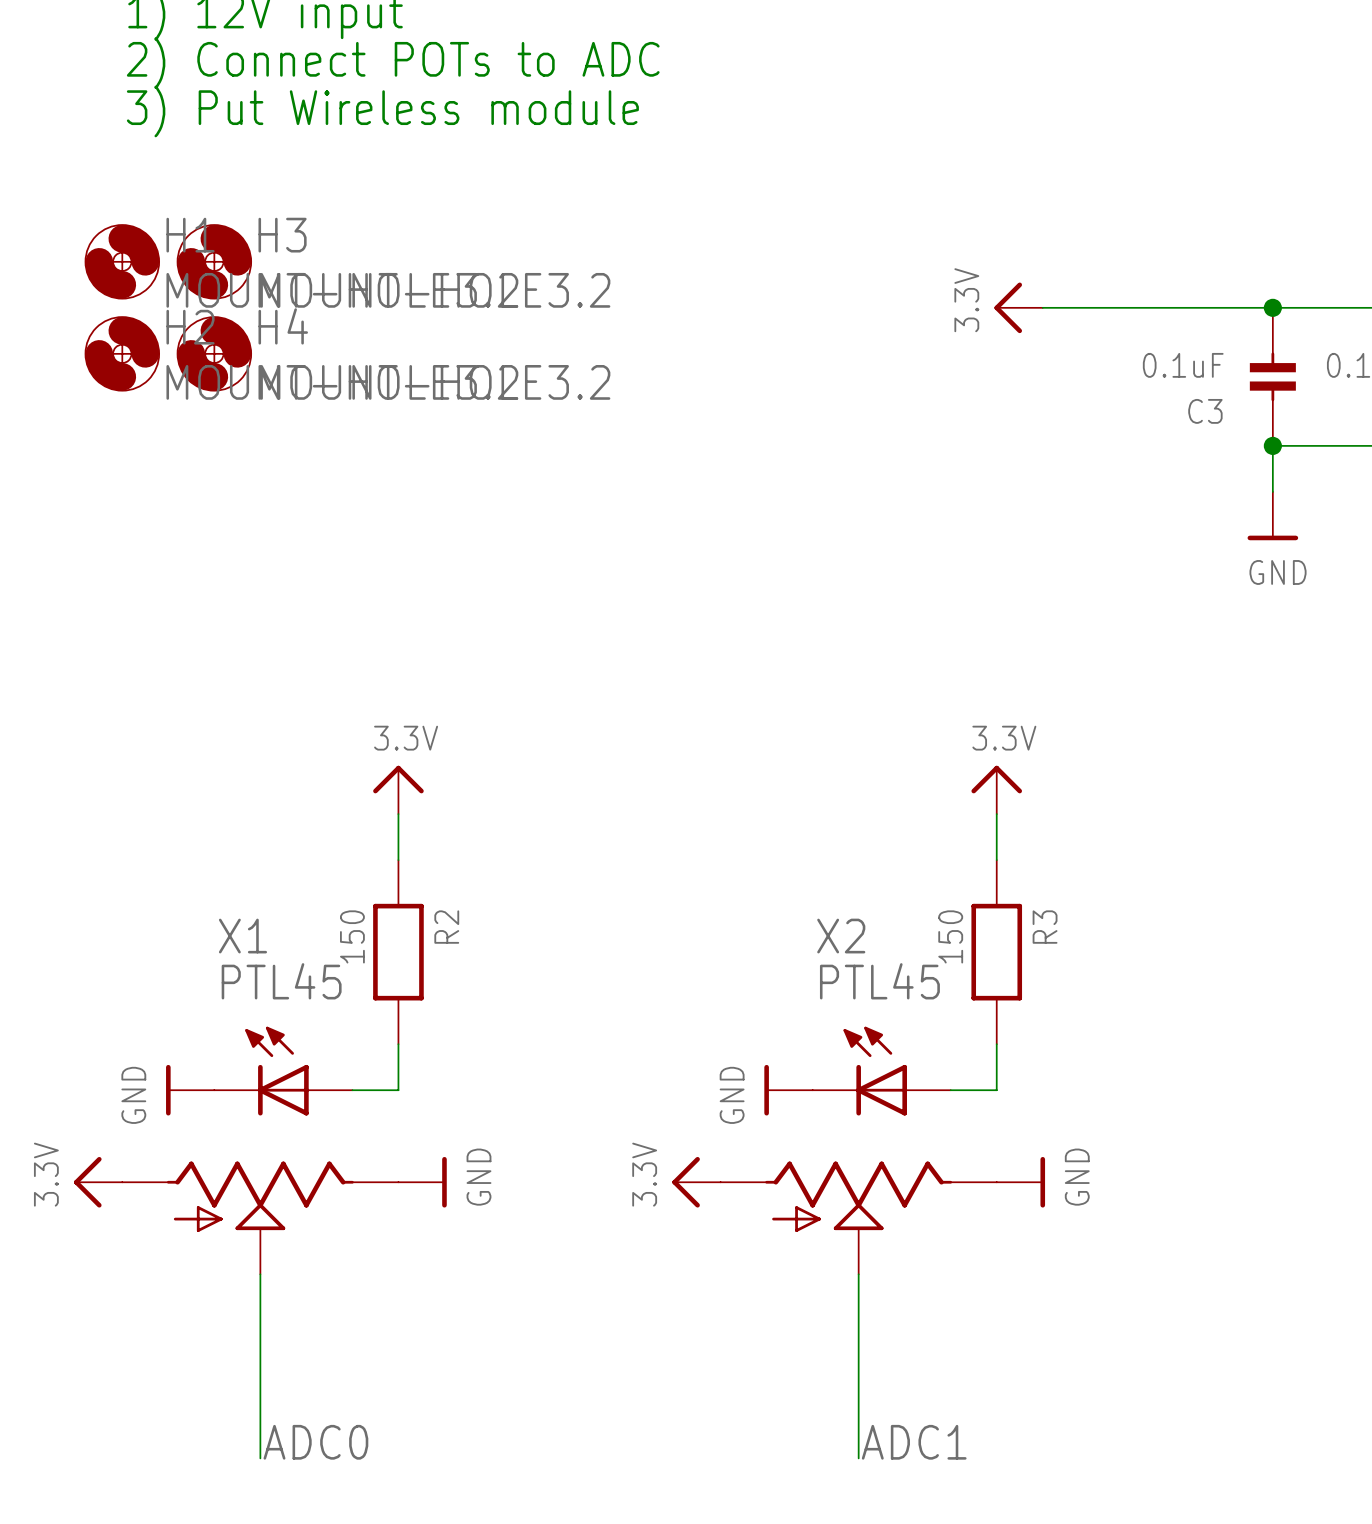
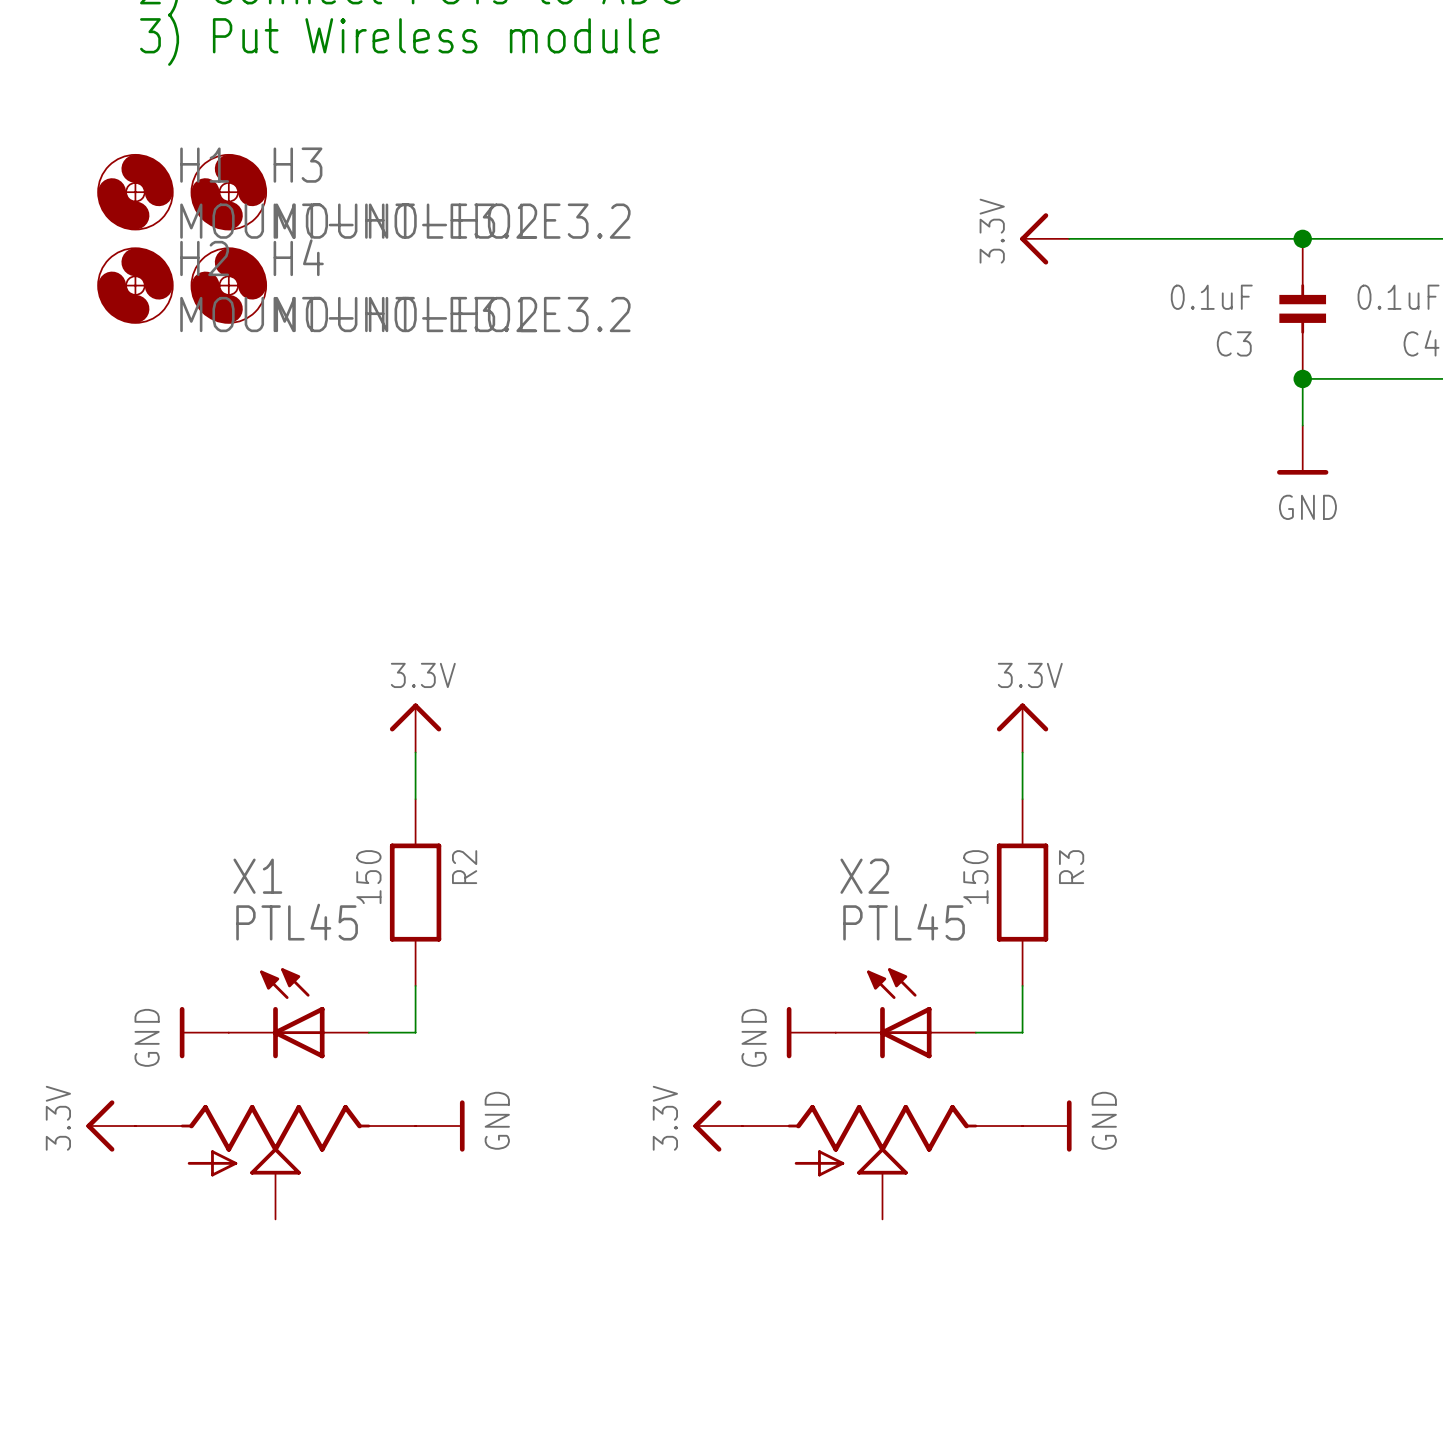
wire: (260, 1274) (260, 1458) -> none
wire: (858, 1274) (858, 1458) -> none
label: ADC0 (315, 1442) -> none
label: ADC1 (914, 1442) -> none

